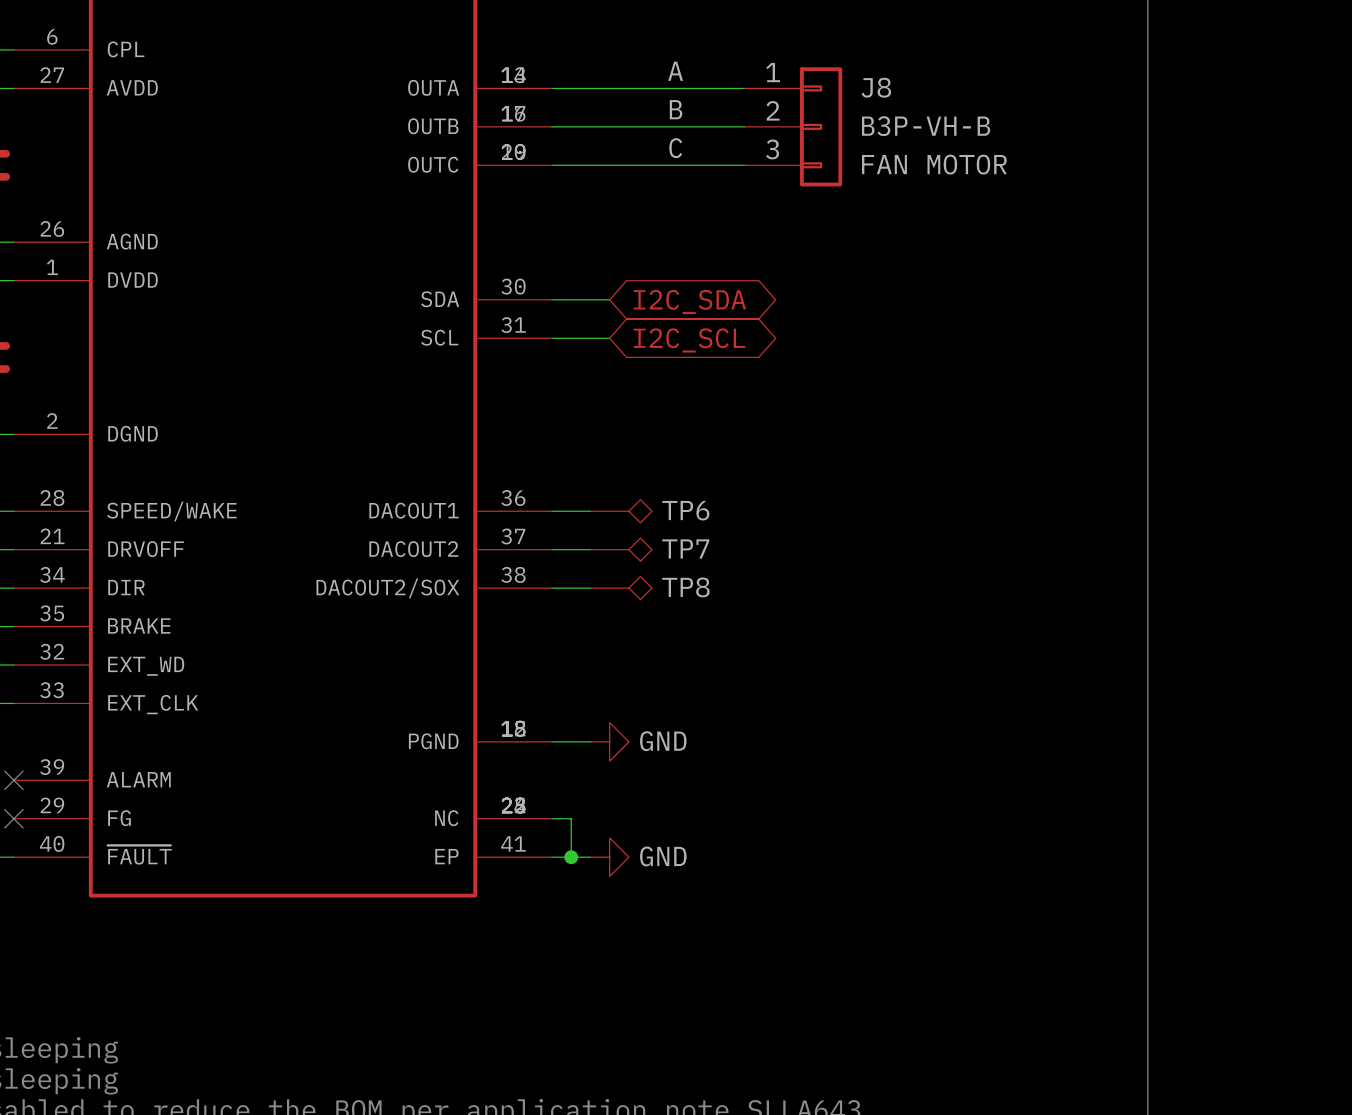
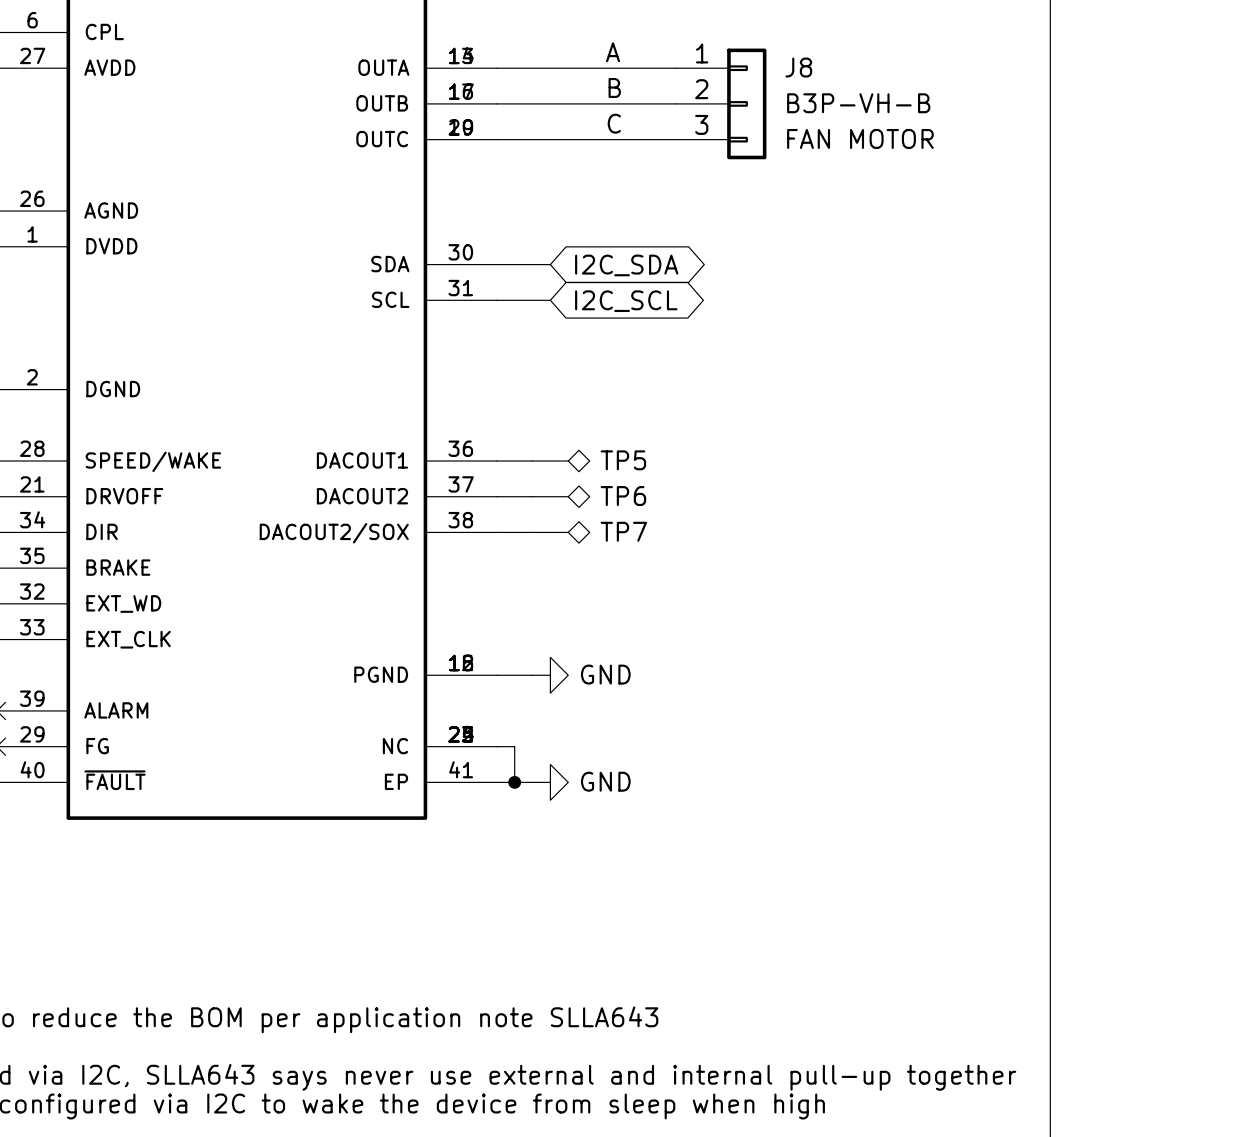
TP6 name: TP6 (685, 510) -> TP5 (623, 460)
TP7 name: TP7 (685, 548) -> TP6 (623, 496)
TP8 name: TP8 (685, 587) -> TP7 (623, 531)

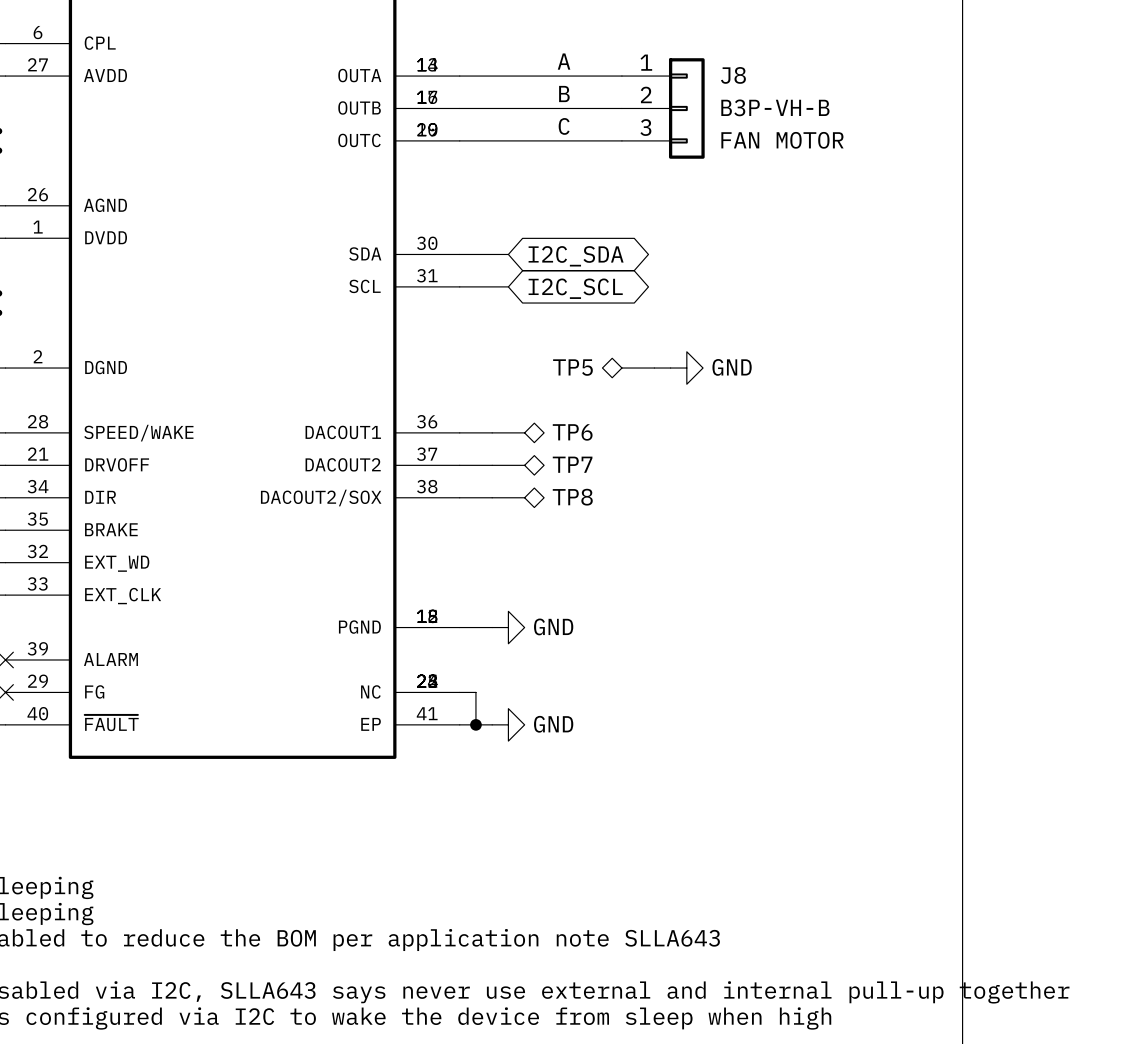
TP5: none -> (628, 368)
wire: none -> (654, 368) (670, 368)
power symbol: none -> GND (686, 368)
TP5 name: TP5 (623, 460) -> TP6 (572, 432)
TP6 name: TP6 (623, 496) -> TP7 (572, 464)
TP7 name: TP7 (623, 531) -> TP8 (572, 497)

